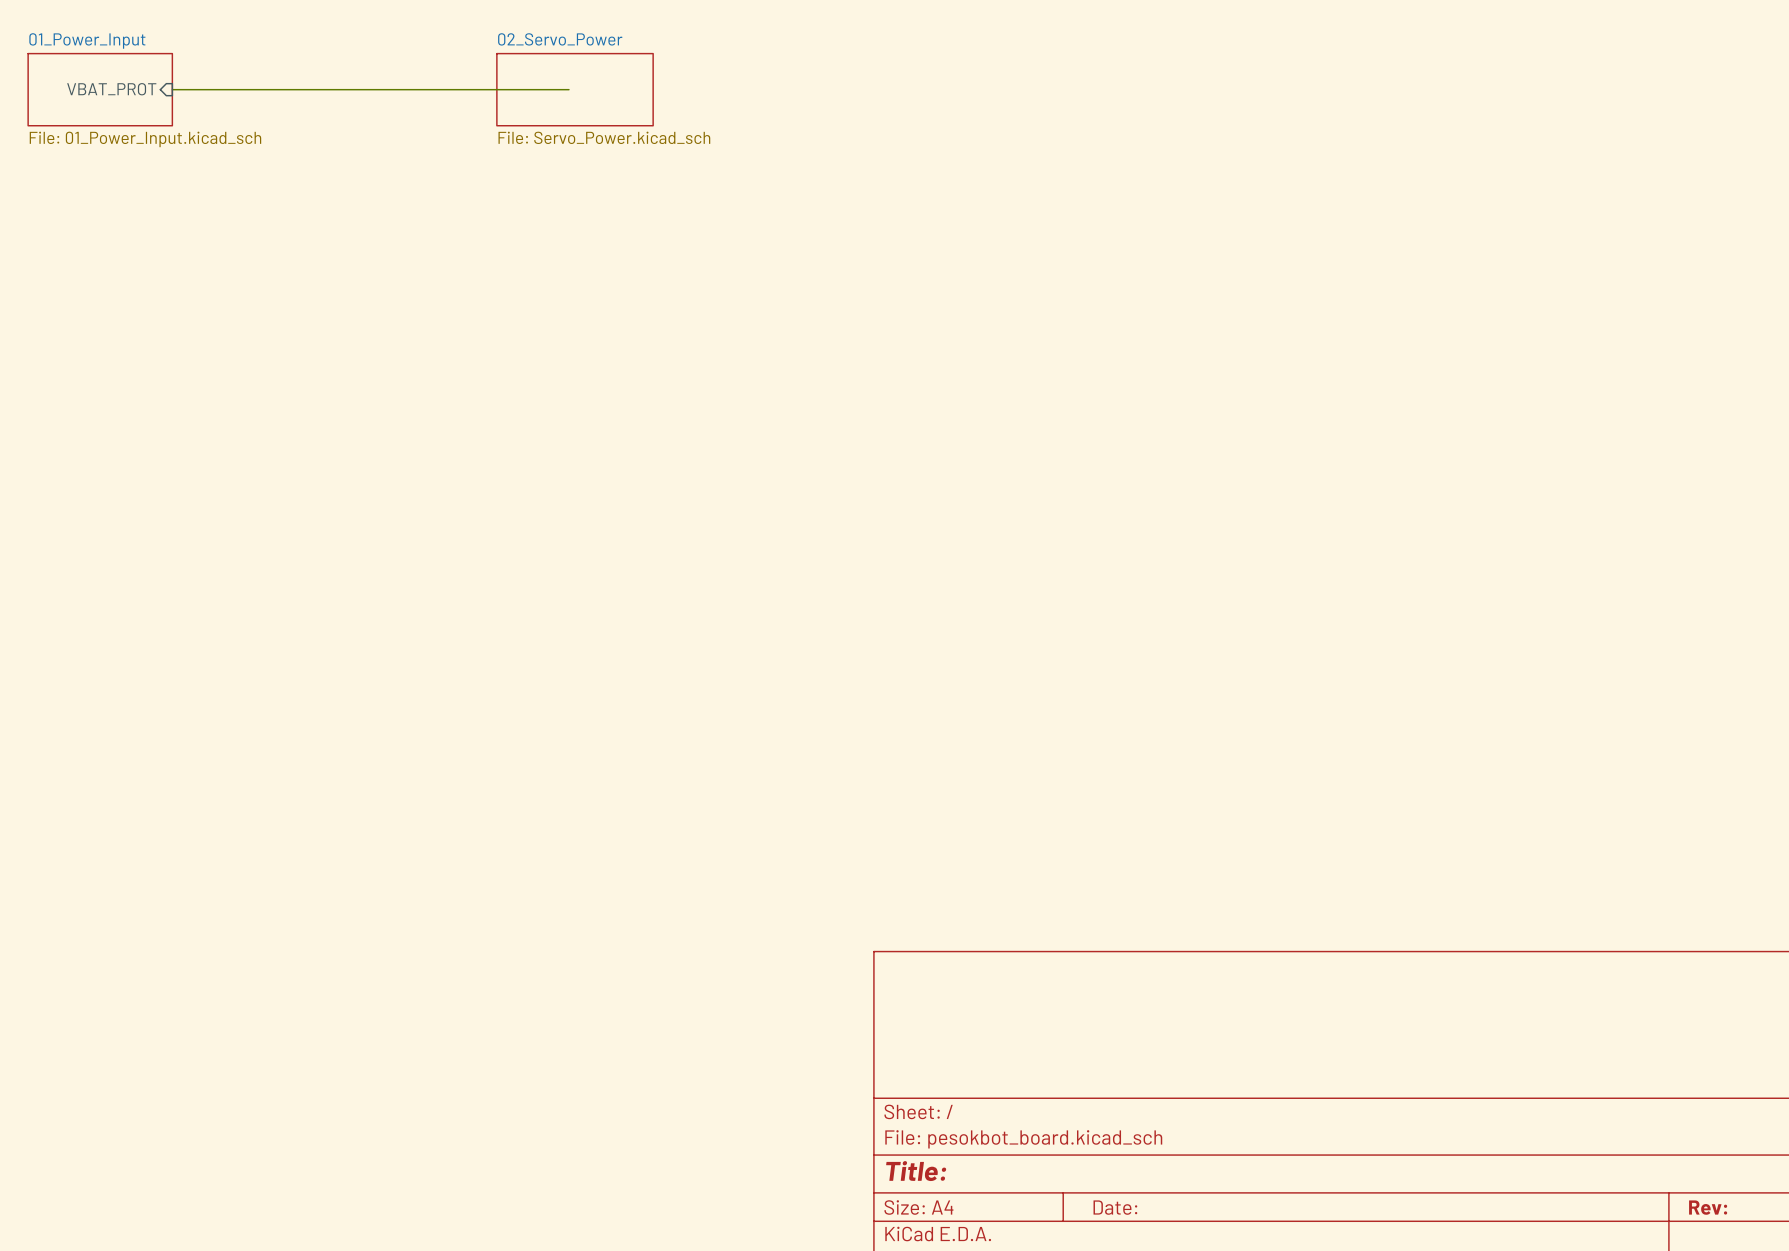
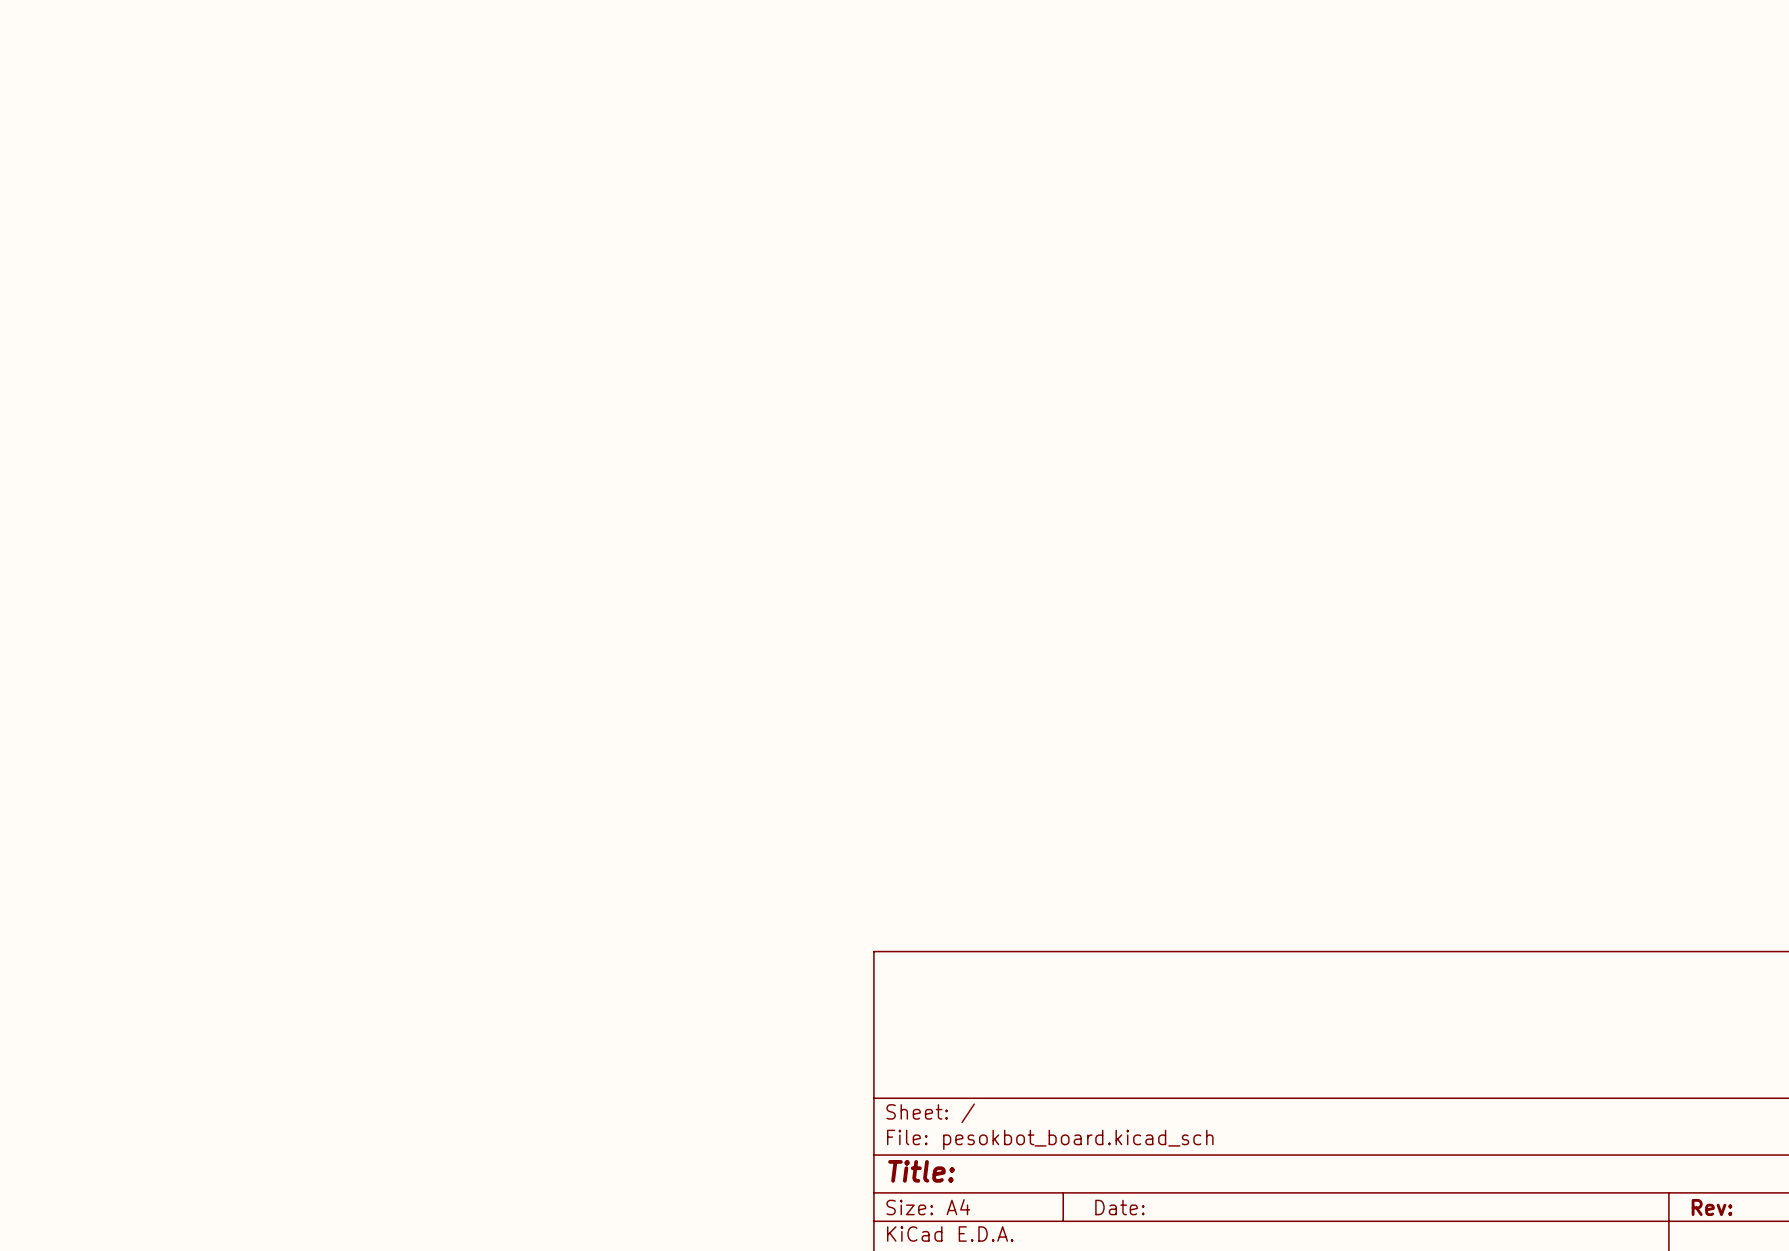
sheet 01_Power_Input: File: 01_Power_Input.kicad_sch (100, 89) -> none
sheet pin: VBAT_PROT (111, 89) -> none
wire: (172, 89) (569, 89) -> none
sheet 02_Servo_Power: File: Servo_Power.kicad_sch (575, 89) -> none

